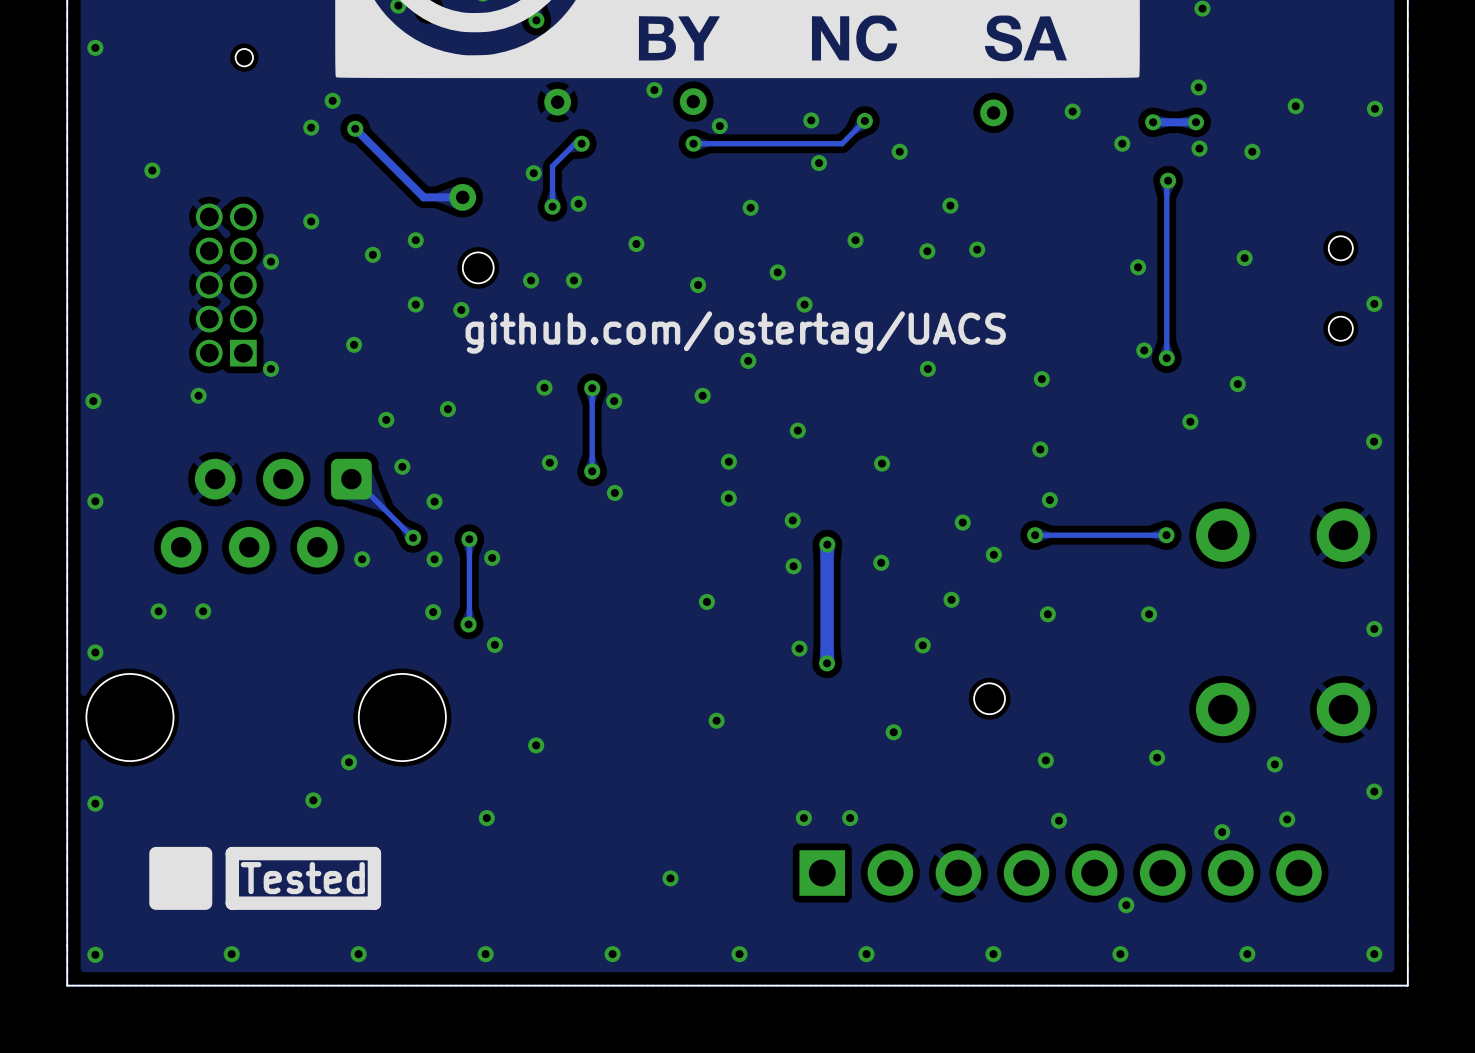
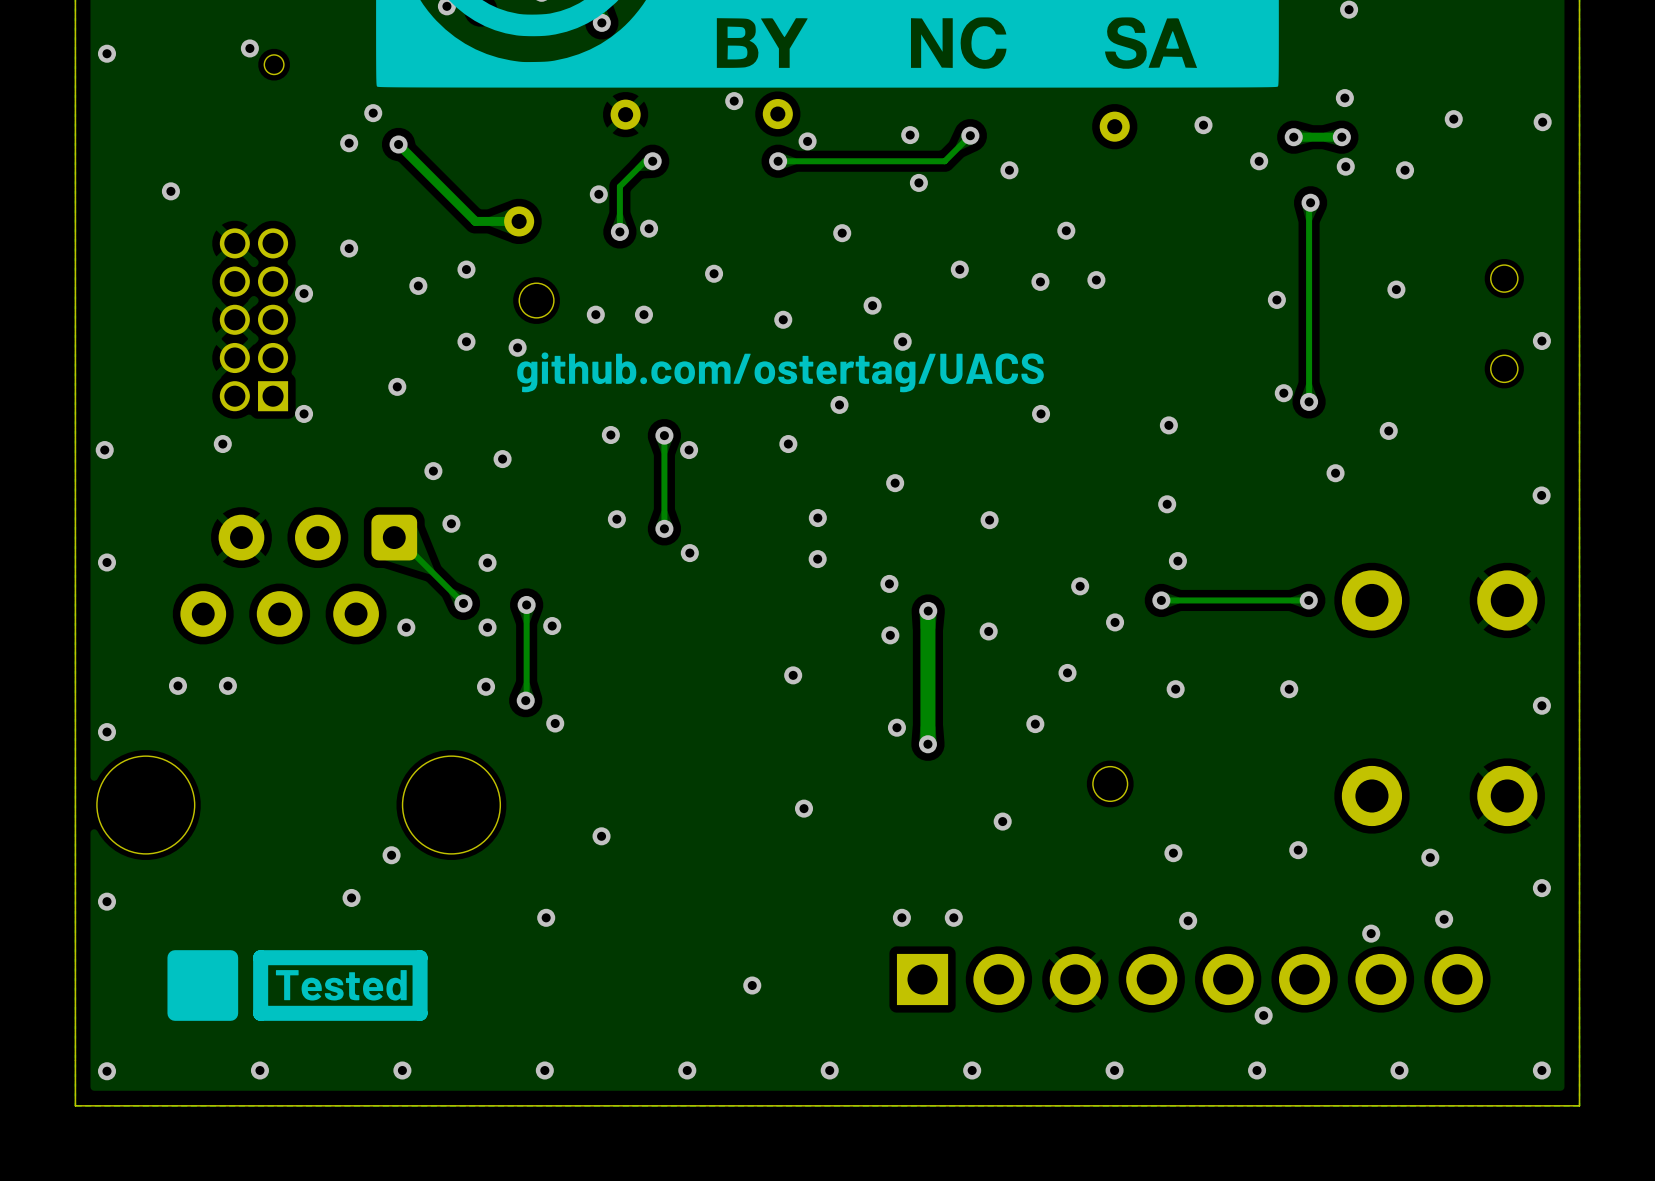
via: none -> (249, 48)

